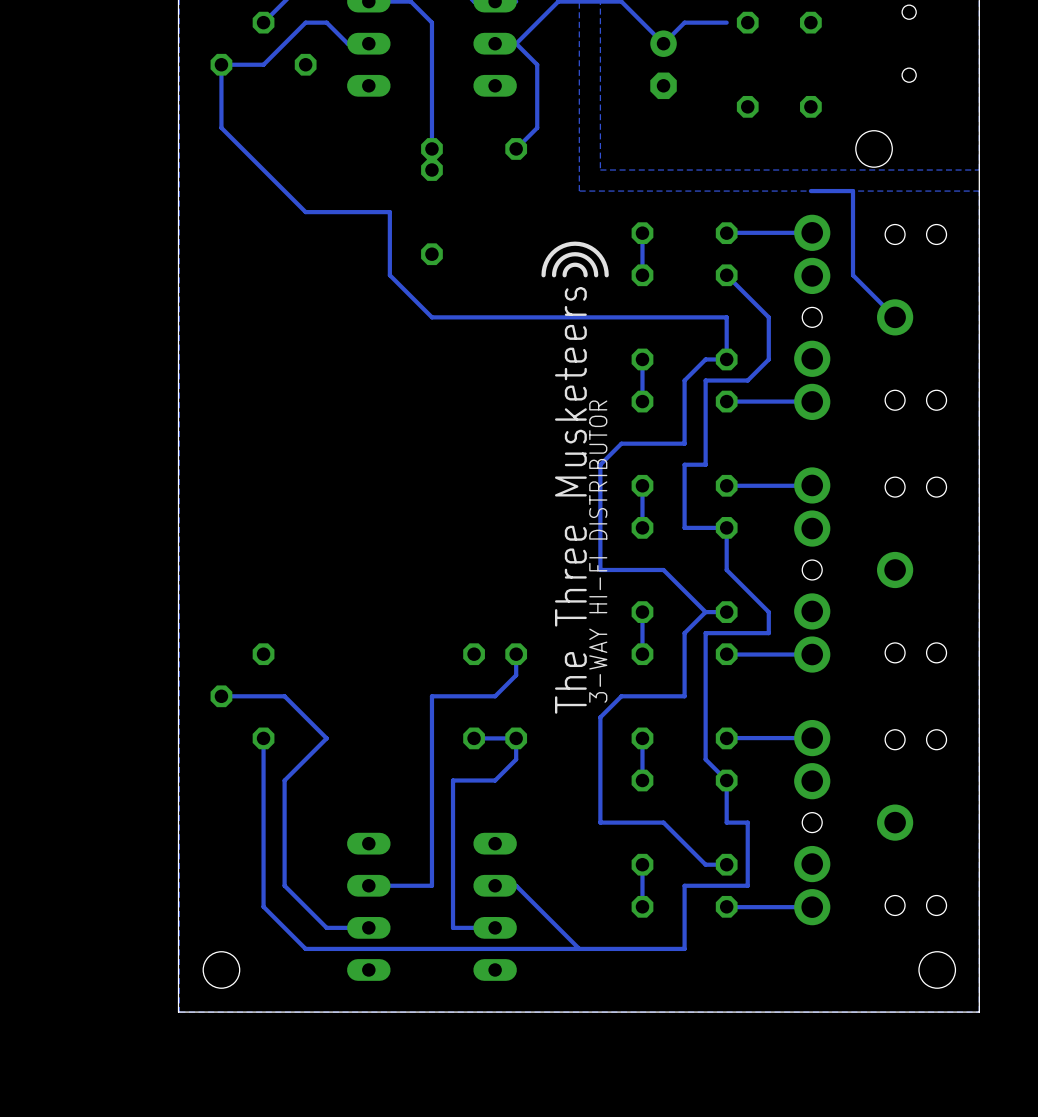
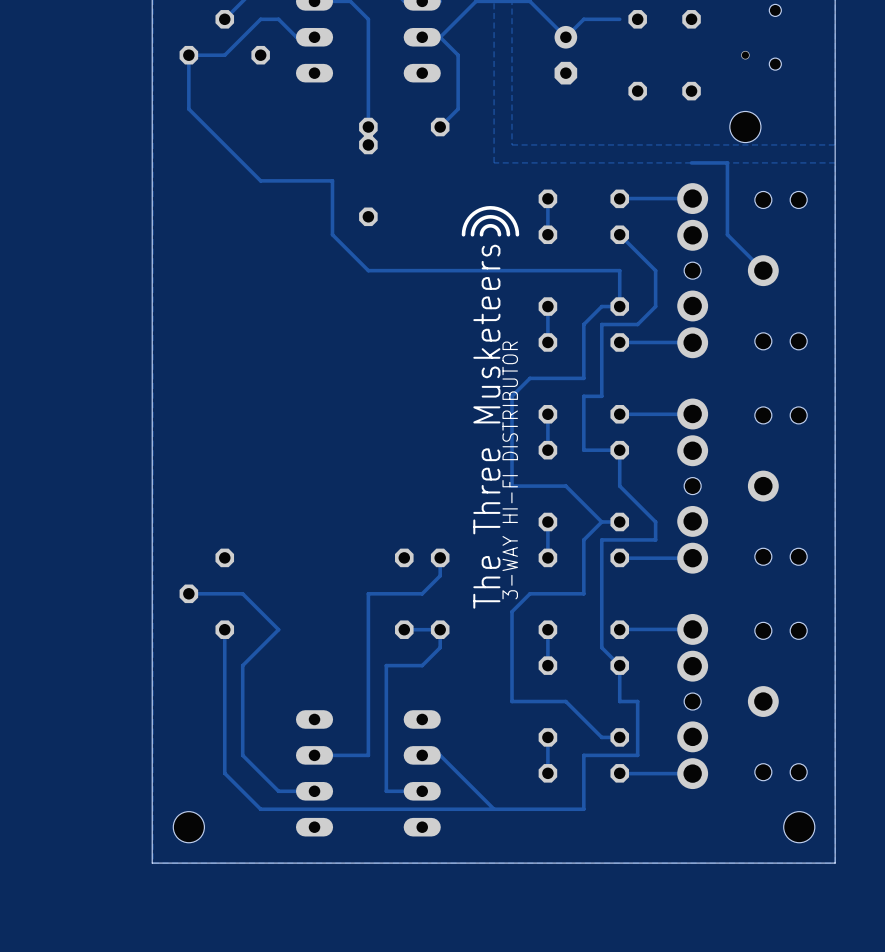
via: none -> (745, 55)

